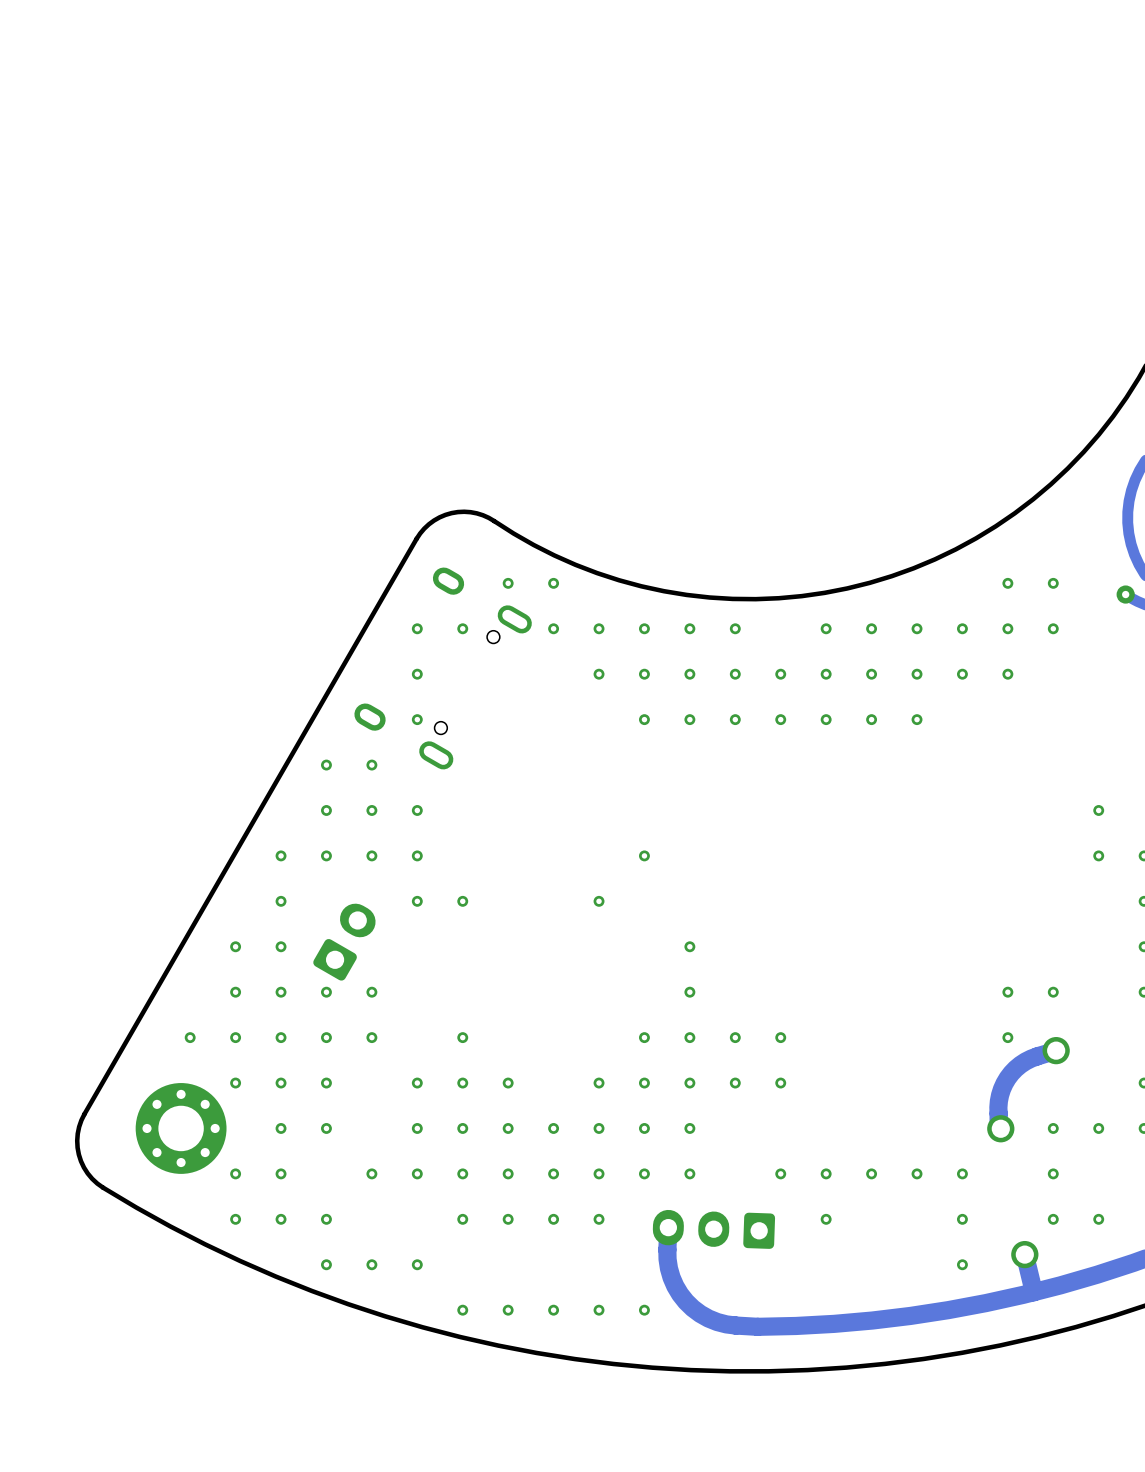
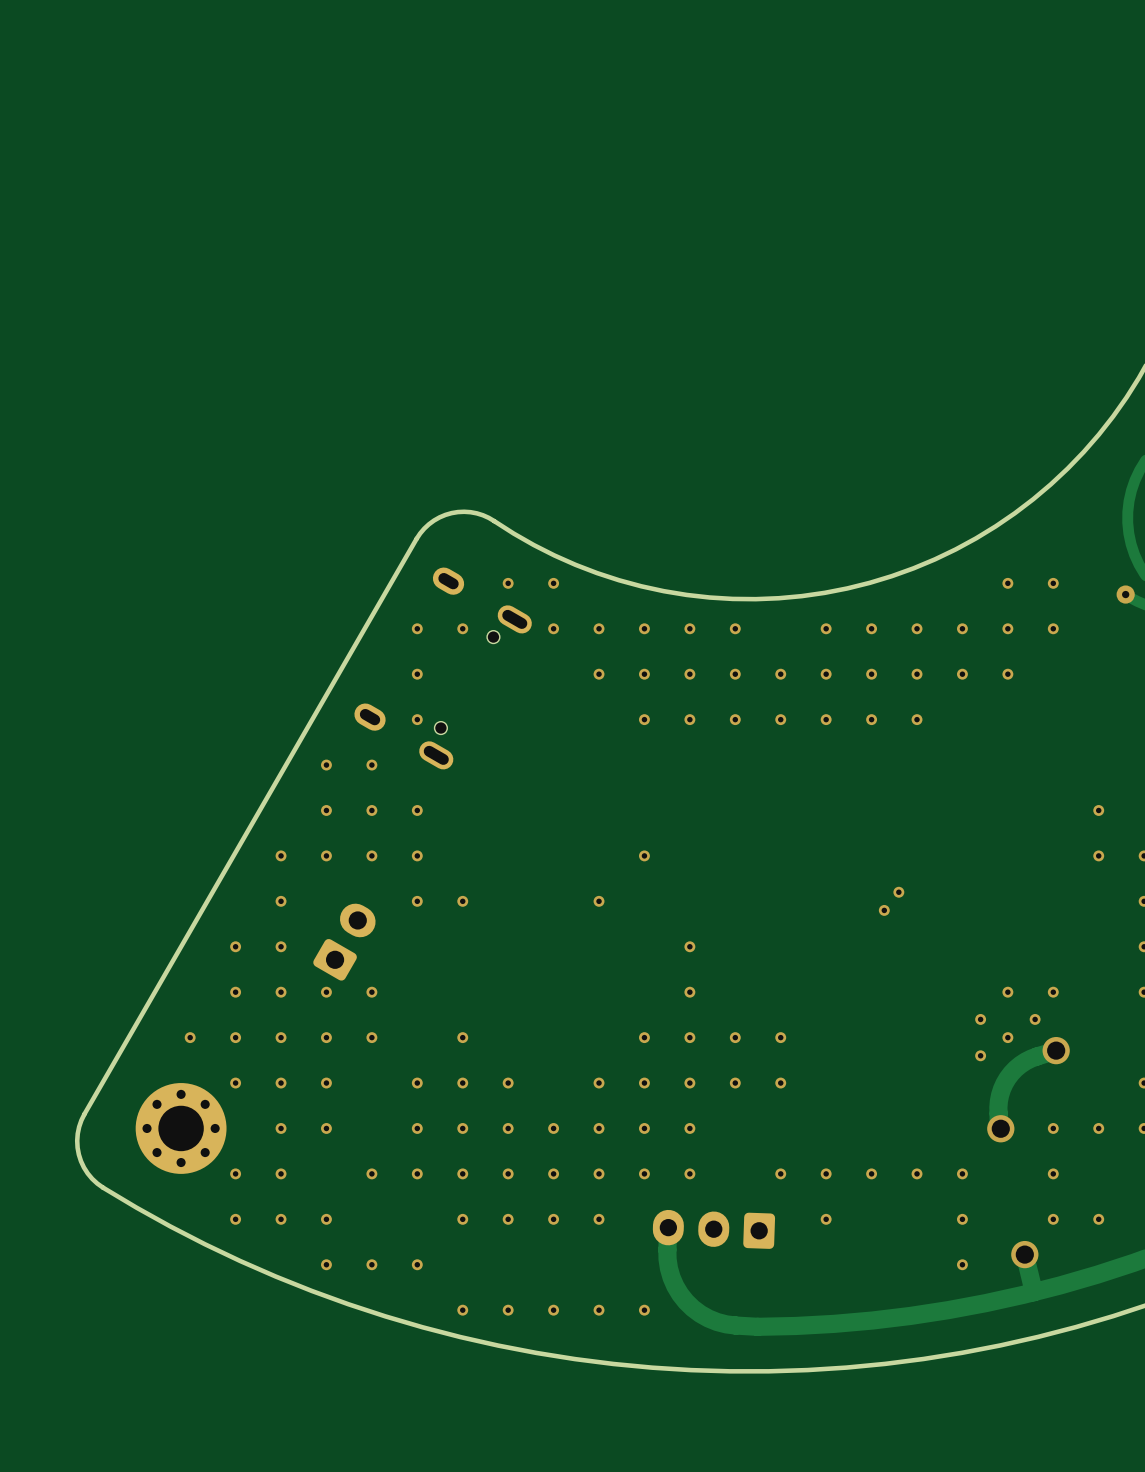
via: none -> (898, 892)
via: none -> (884, 910)
via: none -> (980, 1019)
via: none -> (1035, 1019)
via: none -> (980, 1055)

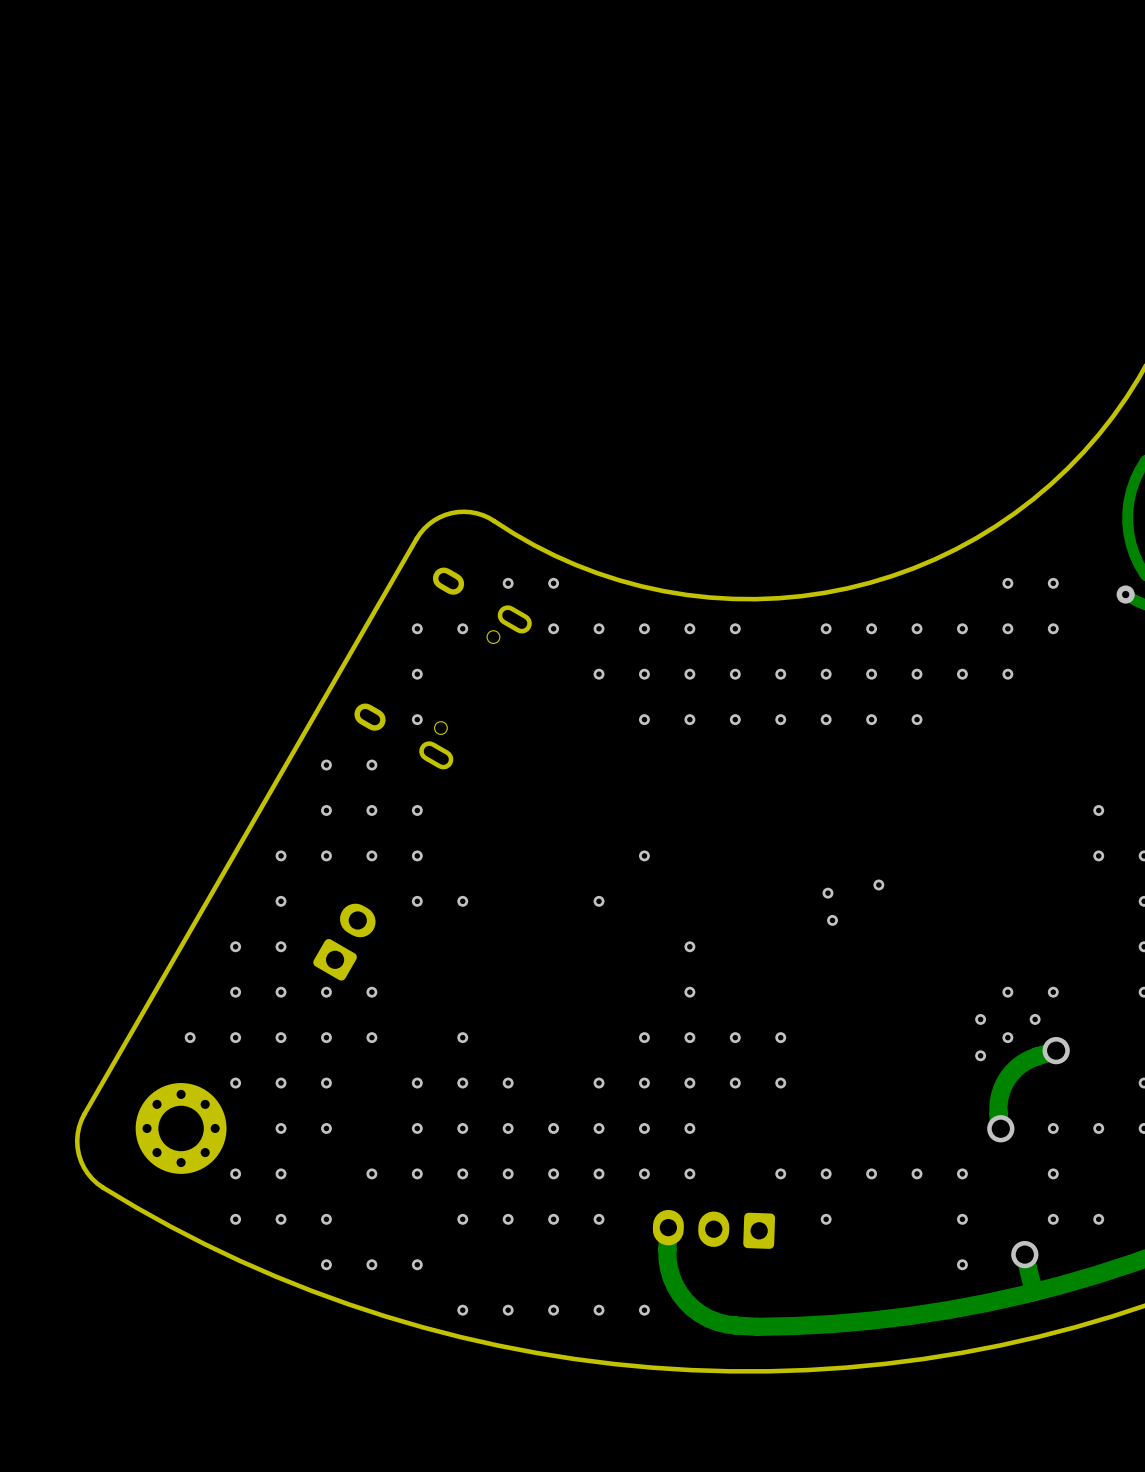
via: none -> (878, 884)
via: (898, 892) -> none
via: none -> (827, 893)
via: (884, 910) -> none
via: none -> (832, 920)

